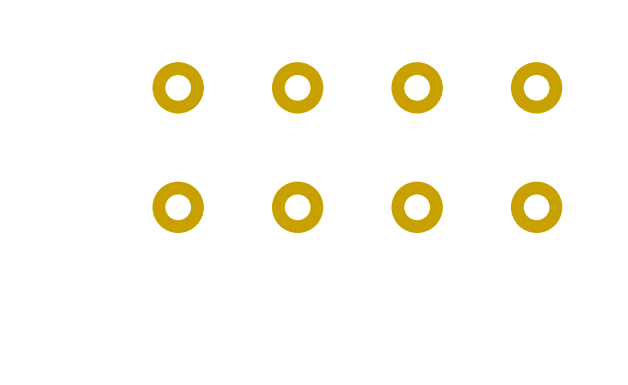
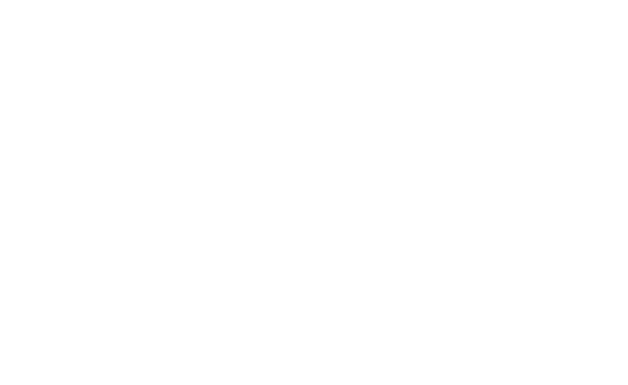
part: (178, 87) -> none
part: (297, 87) -> none
part: (417, 87) -> none
part: (536, 87) -> none
part: (178, 207) -> none
part: (297, 207) -> none
part: (417, 207) -> none
part: (536, 207) -> none

